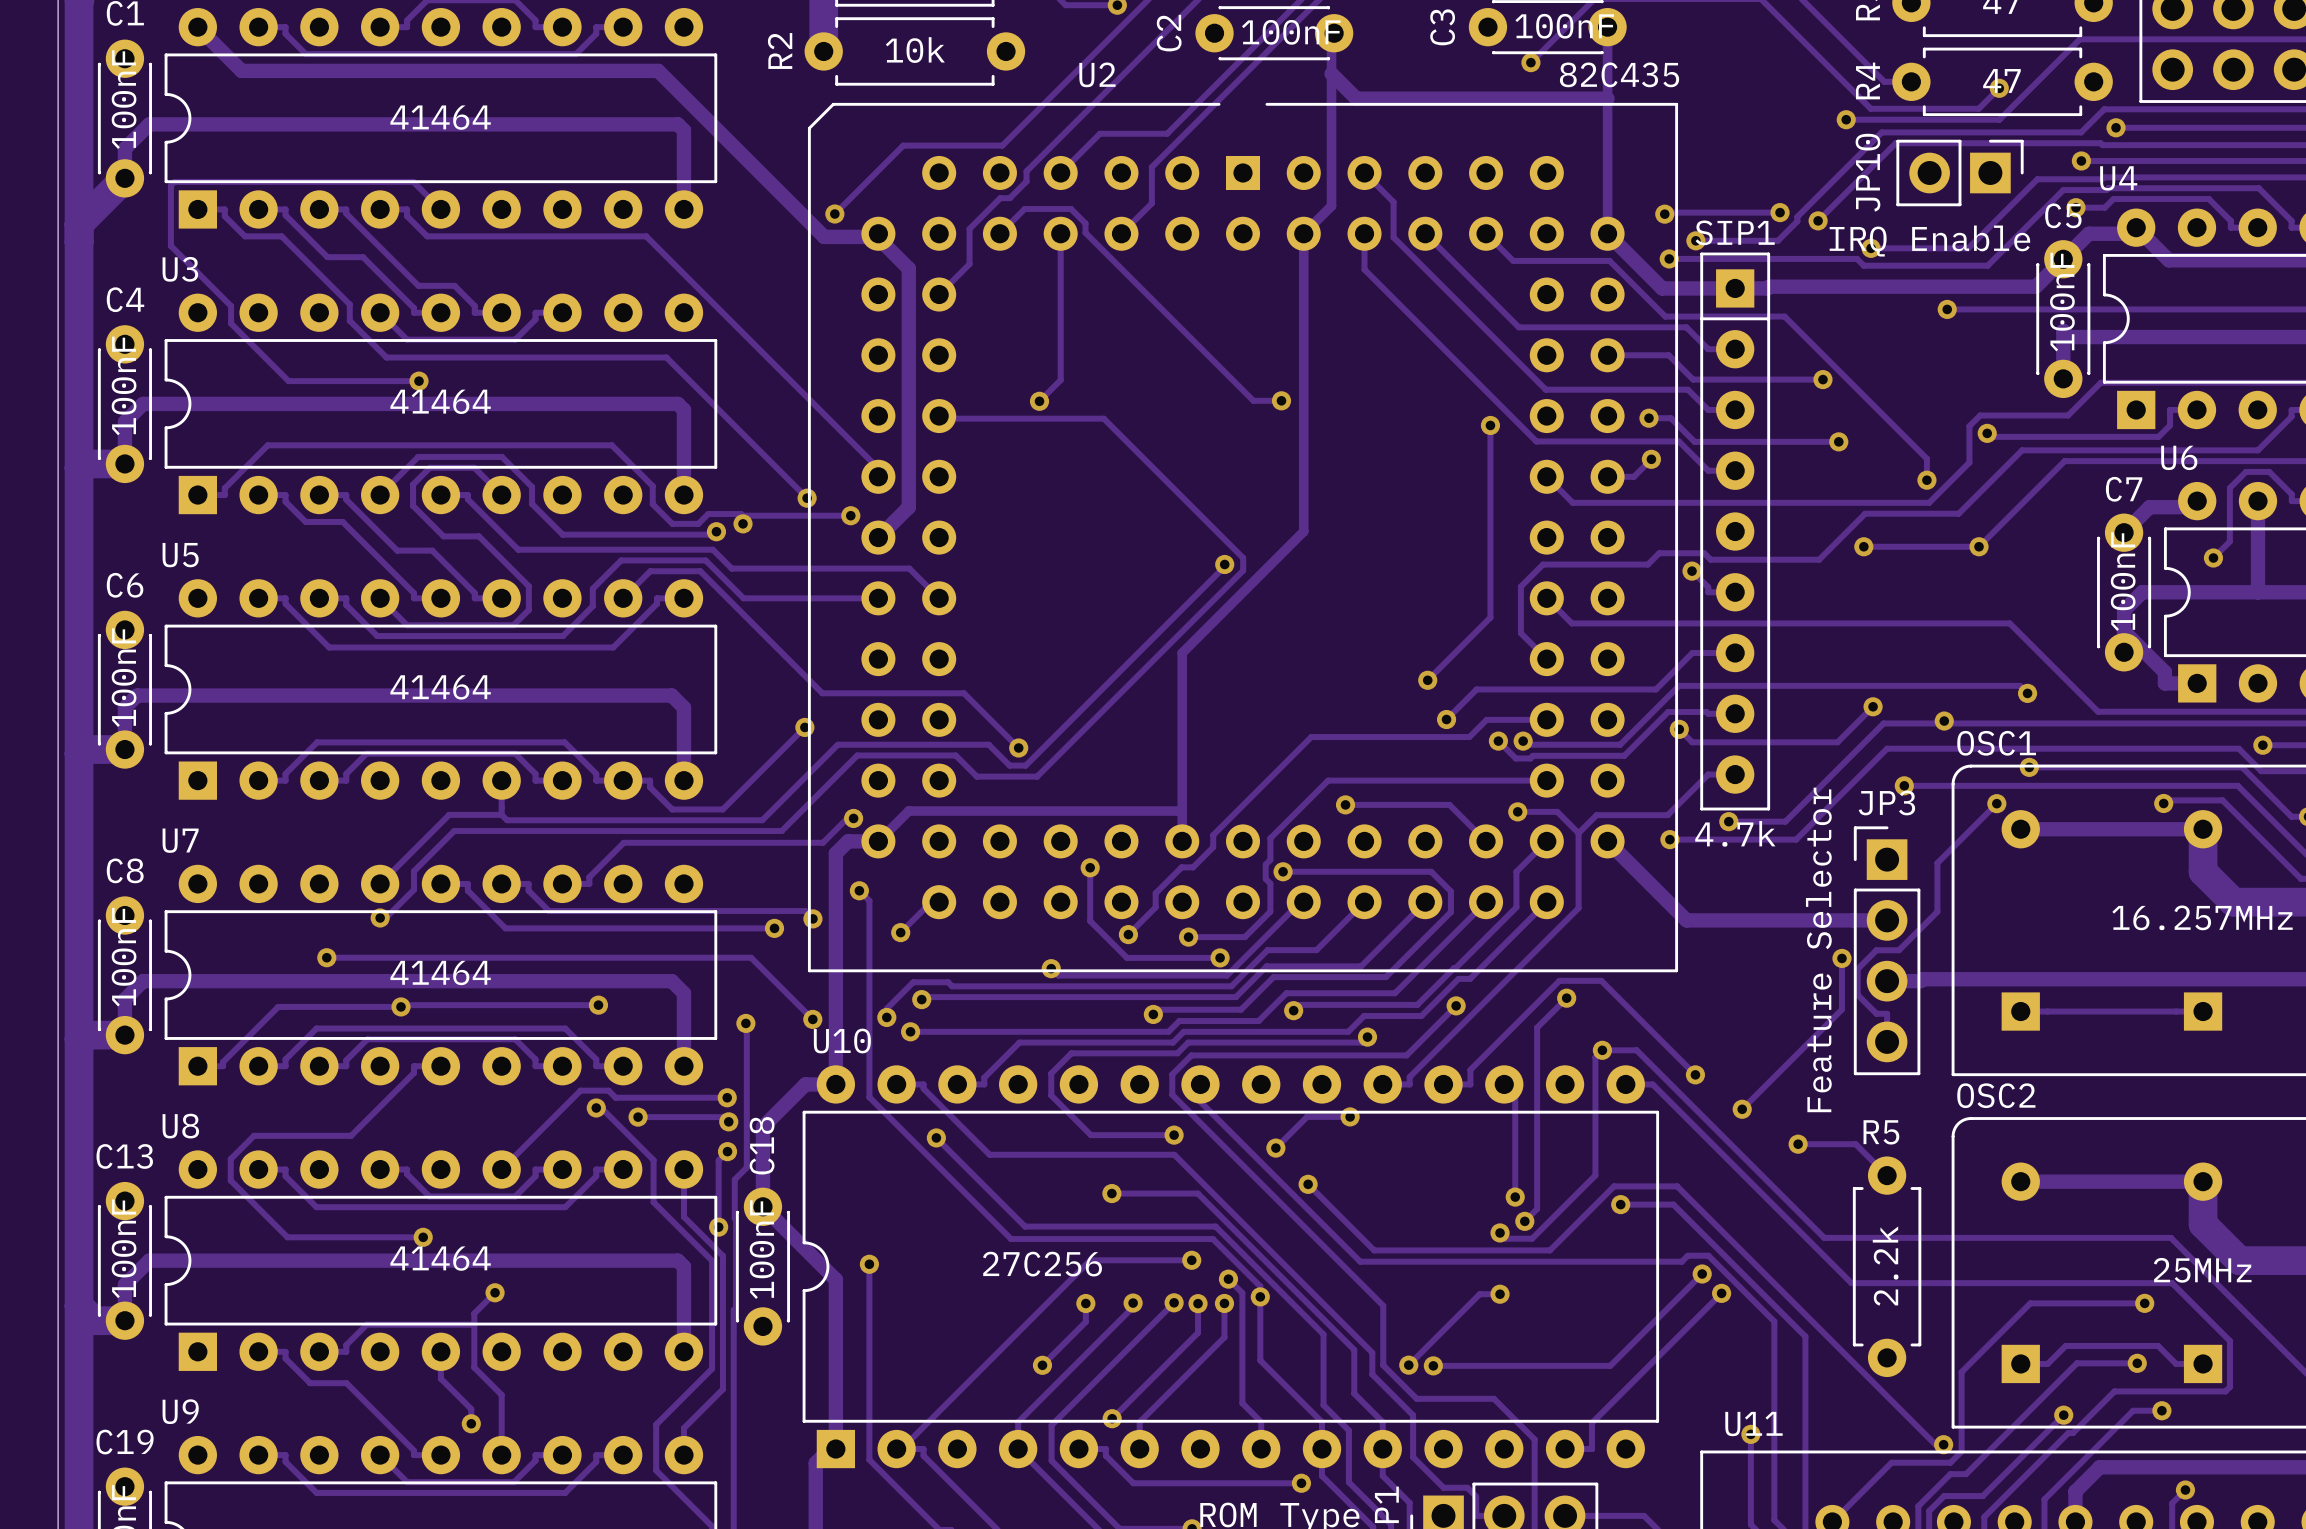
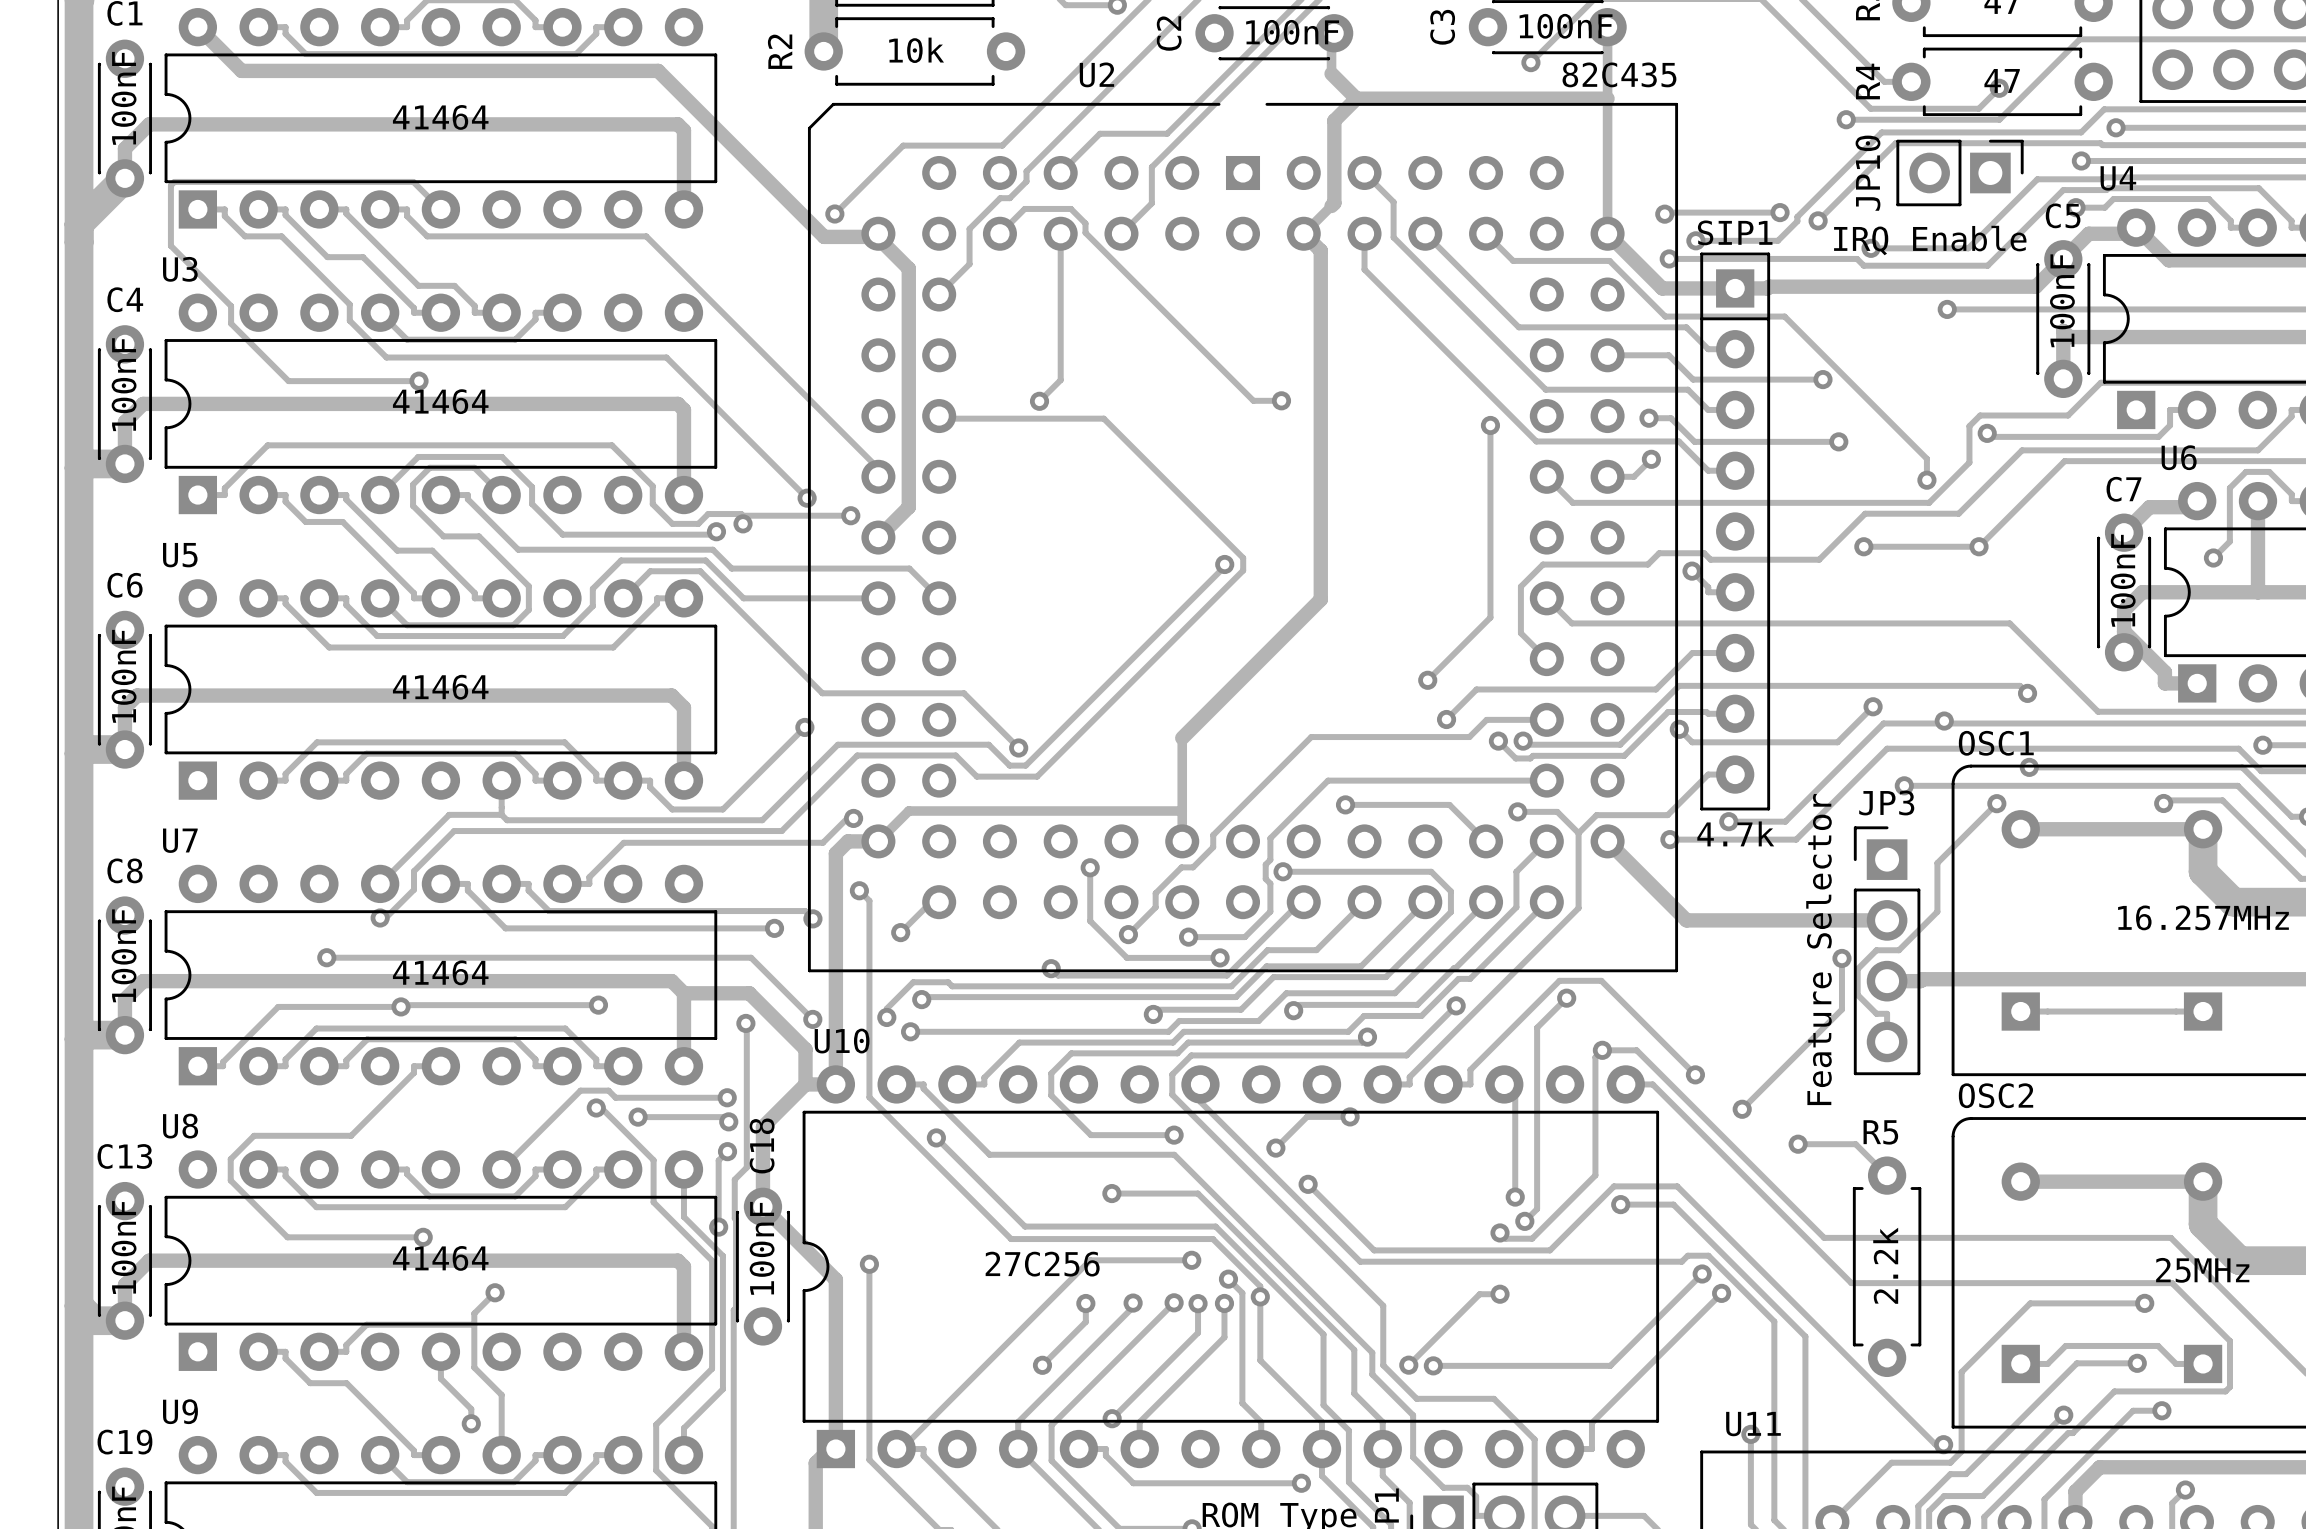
track: (1331, 73) (1331, 205) -> (1356, 98) (1334, 120) (1334, 203) (1331, 205)
track: (1303, 233) (1303, 531) (1182, 653) (1182, 738) -> (1303, 233) (1320, 250) (1320, 599) (1182, 738)
track: none -> (683, 993) (749, 993) (805, 1049) (805, 1084)

